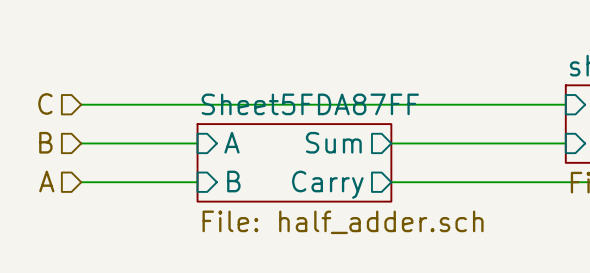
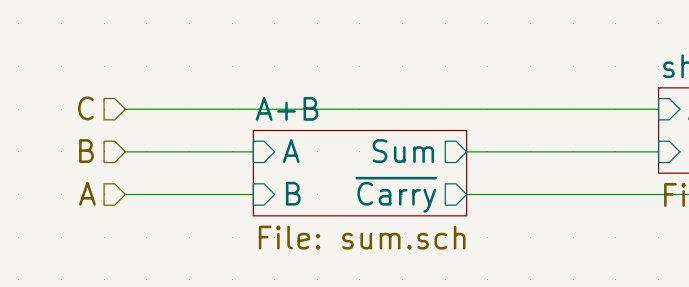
sheet Sheet5FDA87FF name: Sheet5FDA87FF (310, 104) -> A+B (287, 108)
sheet pin: Carry (327, 184) -> ~{Carry} (396, 194)
sheet Sheet5FDA87FF value: File: half_adder.sch (343, 222) -> File: sum.sch (362, 237)

